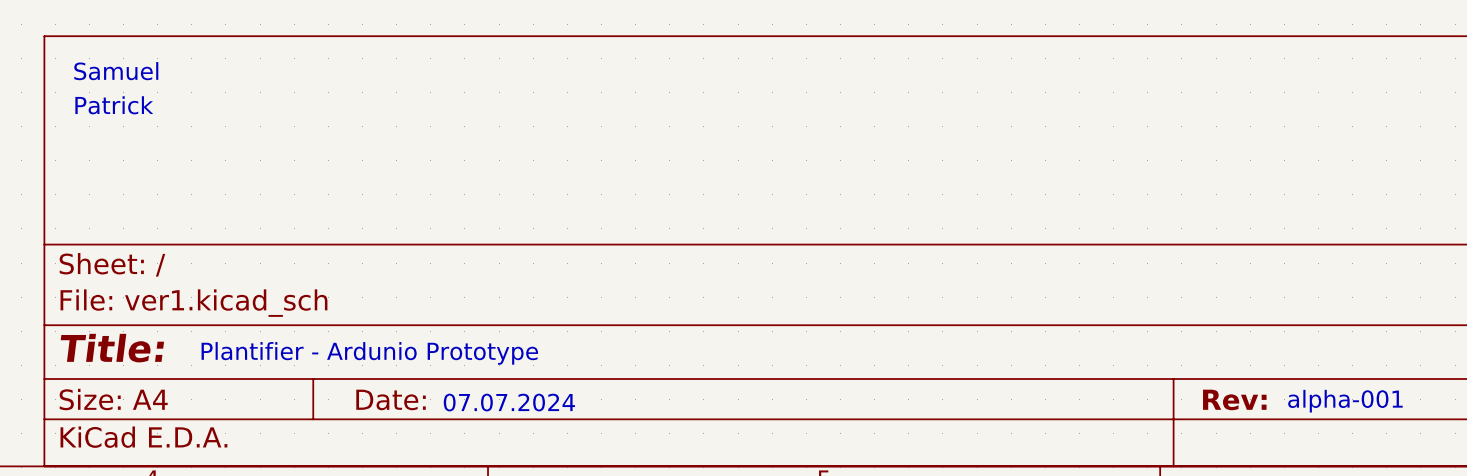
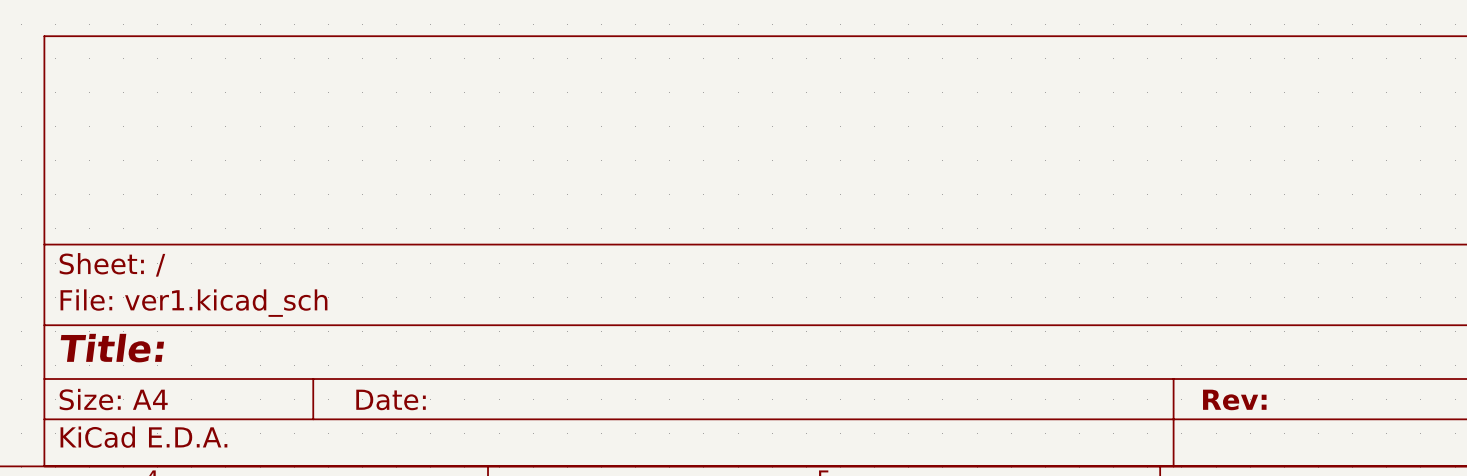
text: Samuel (116, 71) -> none
text: Patrick (114, 105) -> none
text: Plantifier - Ardunio Prototype (369, 353) -> none
text: alpha-001 (1345, 401) -> none
text: 07.07.2024 (509, 402) -> none

